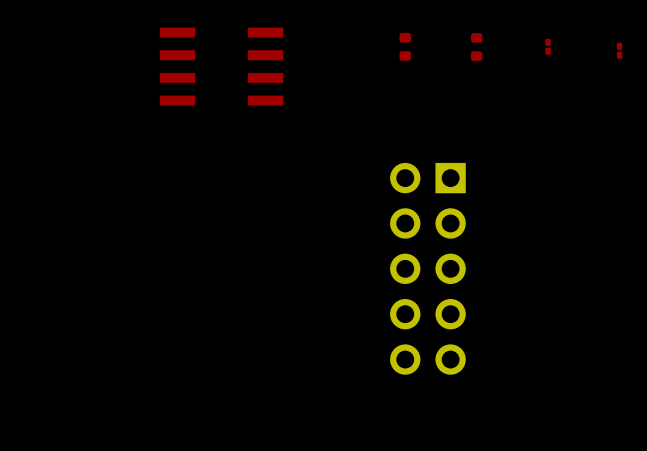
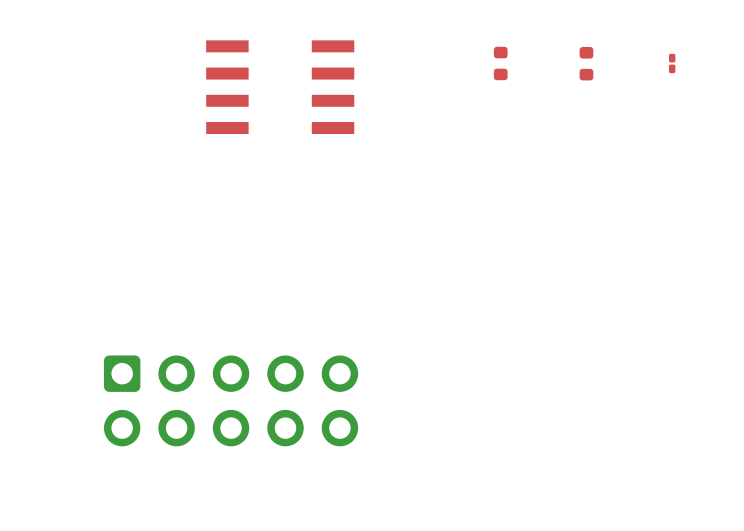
part: (427, 268) -> none
part: none -> (231, 400)

